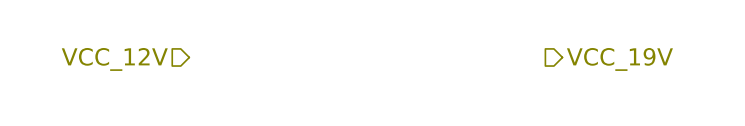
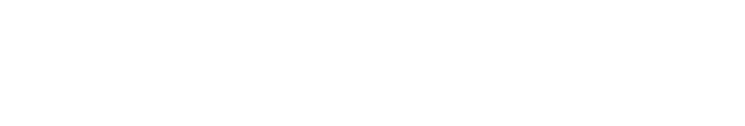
hierarchical label: VCC_12V (114, 59) -> none
hierarchical label: VCC_19V (619, 59) -> none

